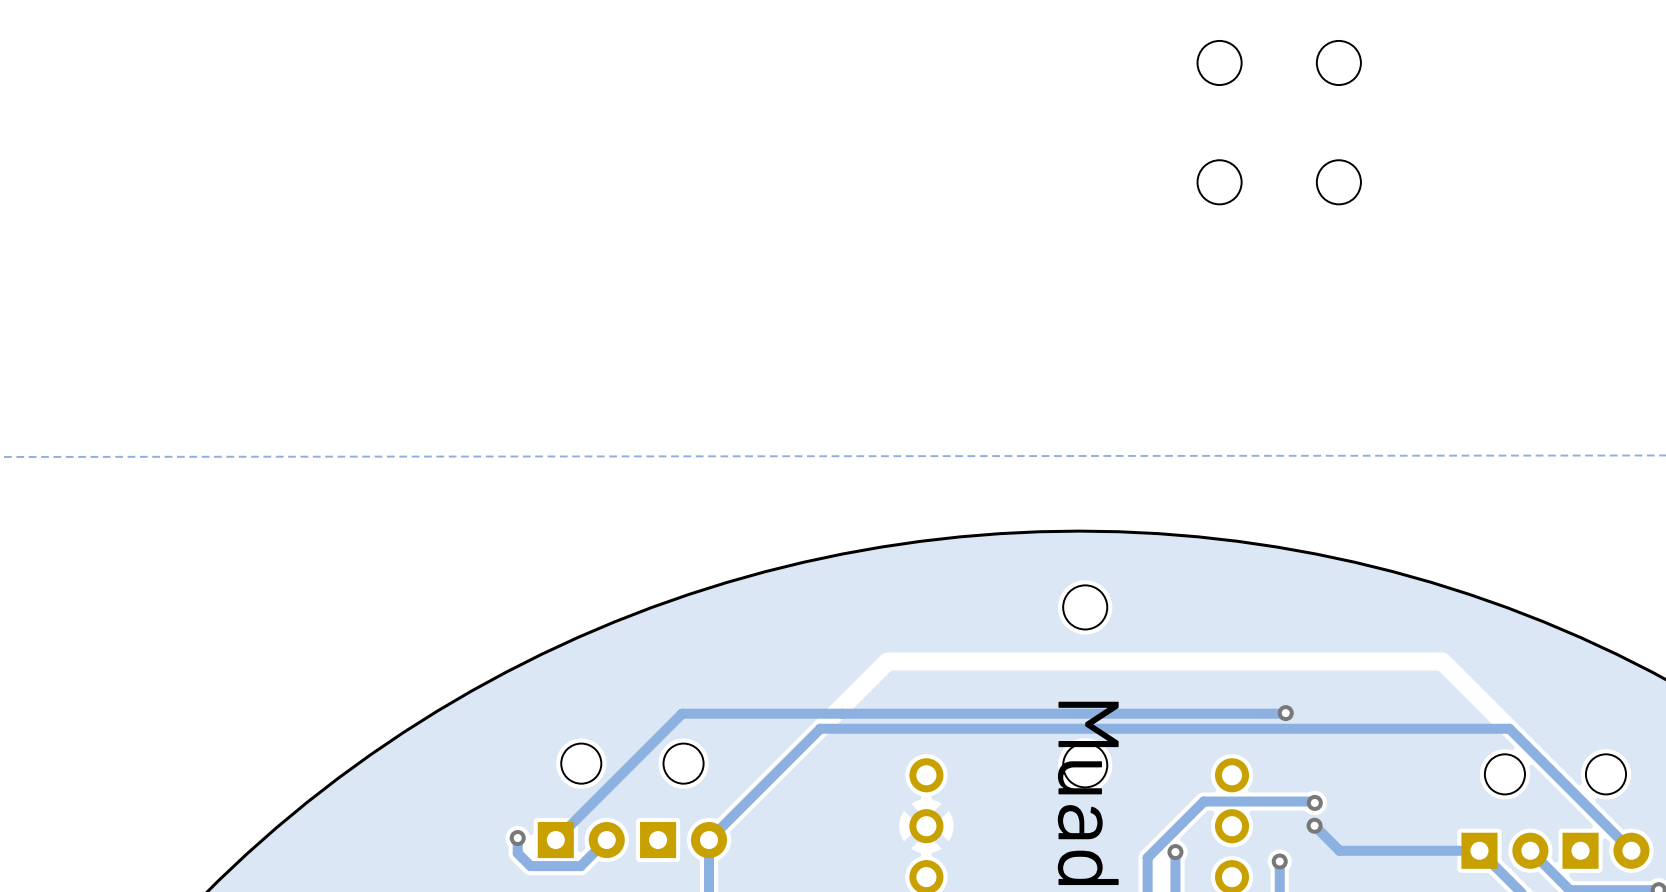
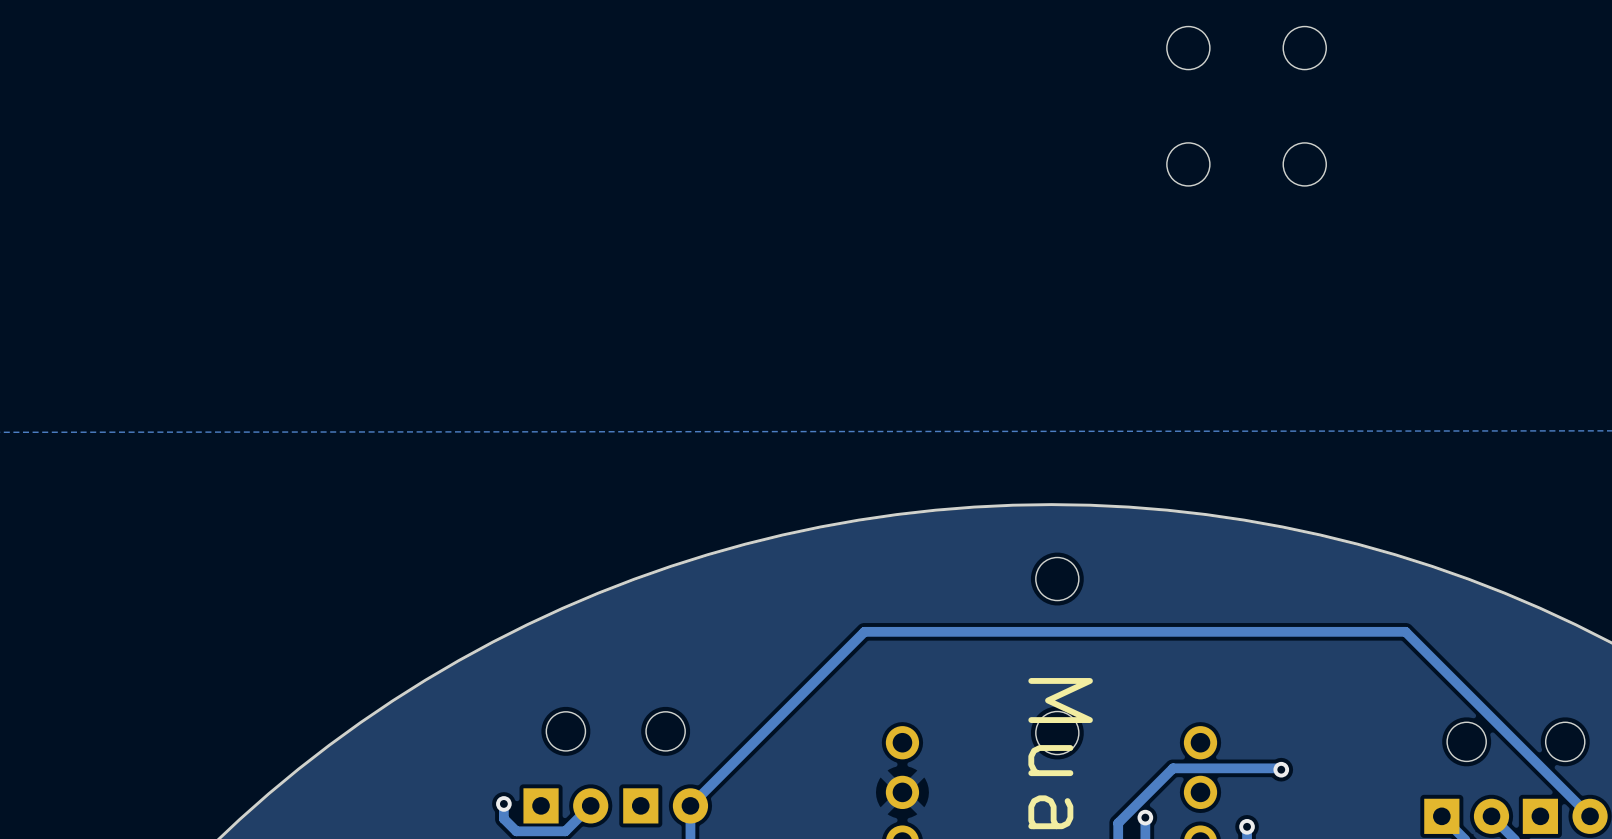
track: (1285, 713) (682, 713) (555, 840) -> none
via: (1285, 713) -> none
track: (1509, 728) (820, 728) -> (1471, 697) (1405, 631) (864, 631) (799, 697)
track: (1314, 825) (1339, 850) (1479, 850) -> none
via: (1314, 825) -> none

